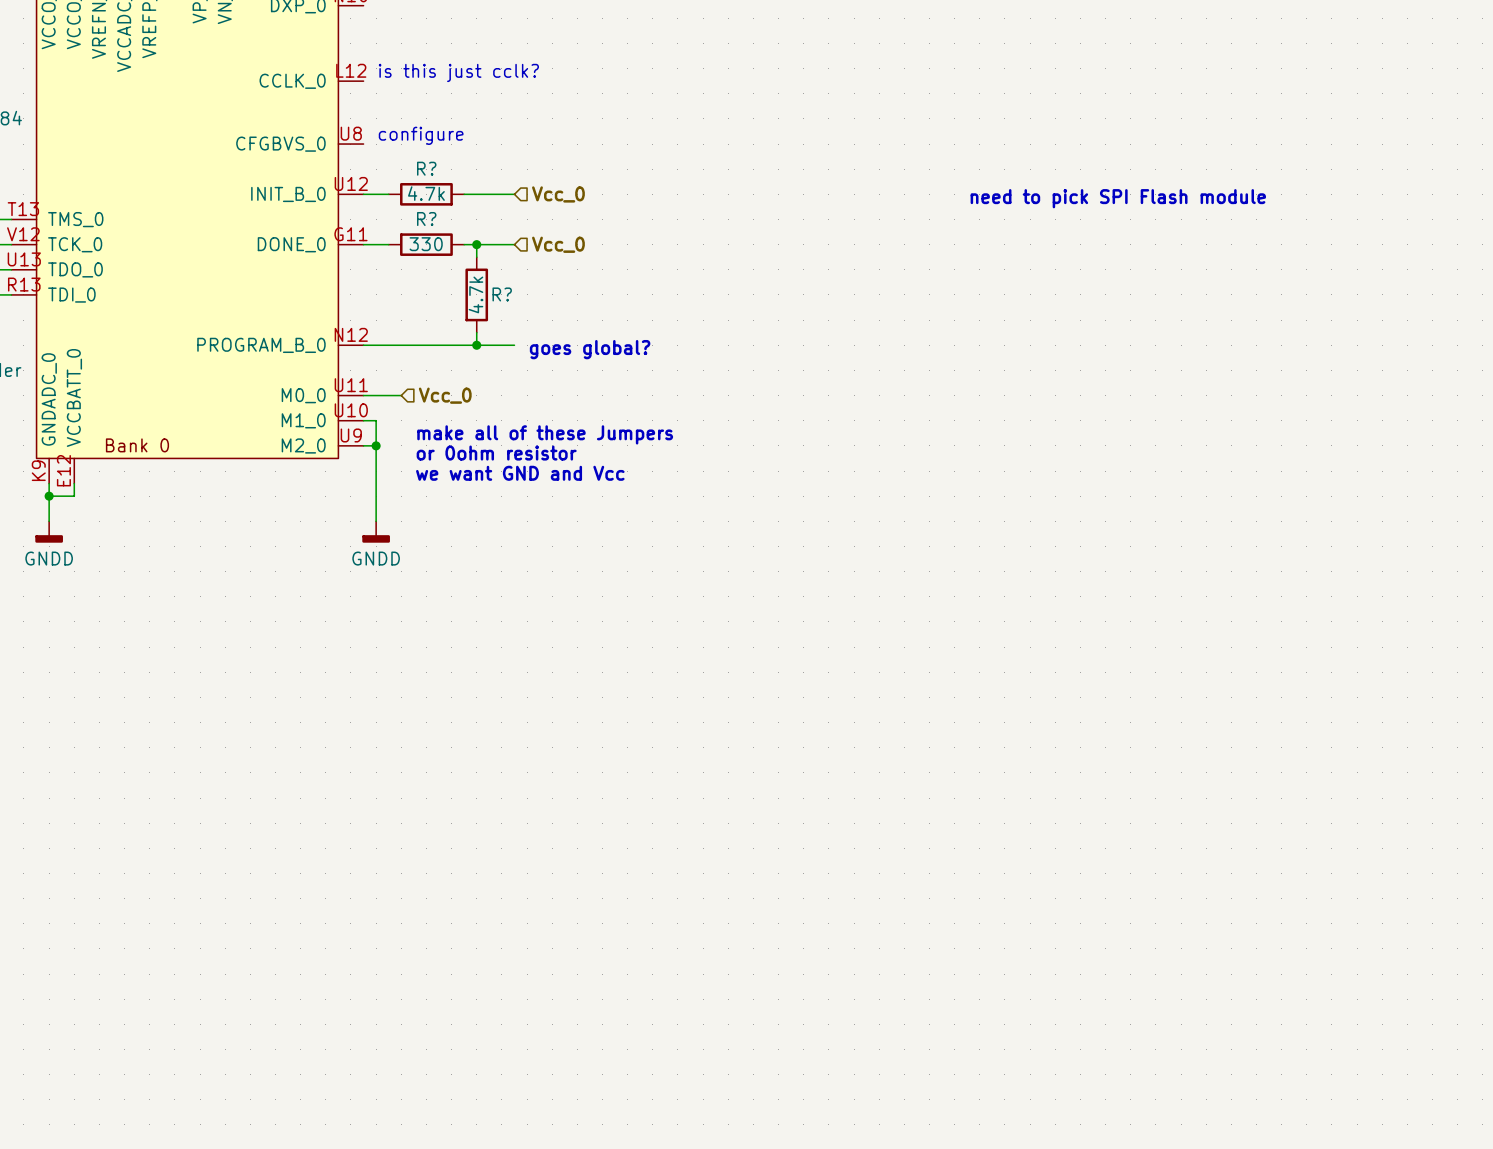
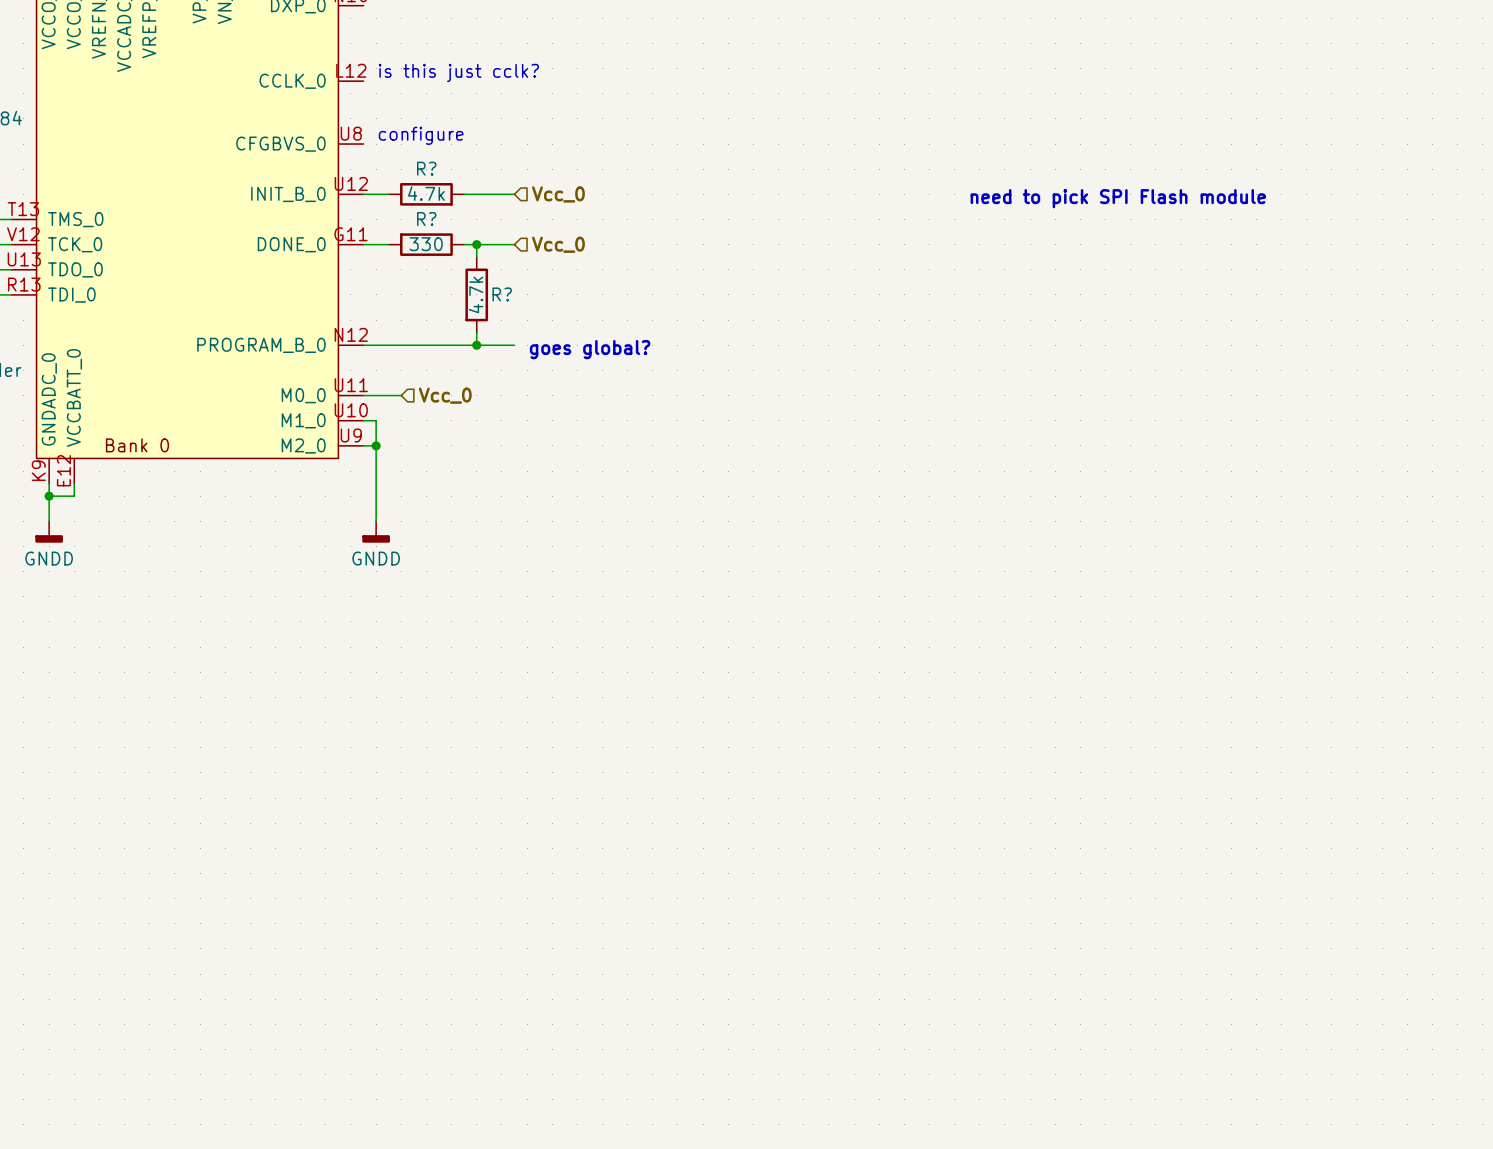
text: make all of these Jumpers (545, 434) -> none
text: or 0ohm resistor (496, 453) -> none
text: we want GND and Vcc (520, 473) -> none

